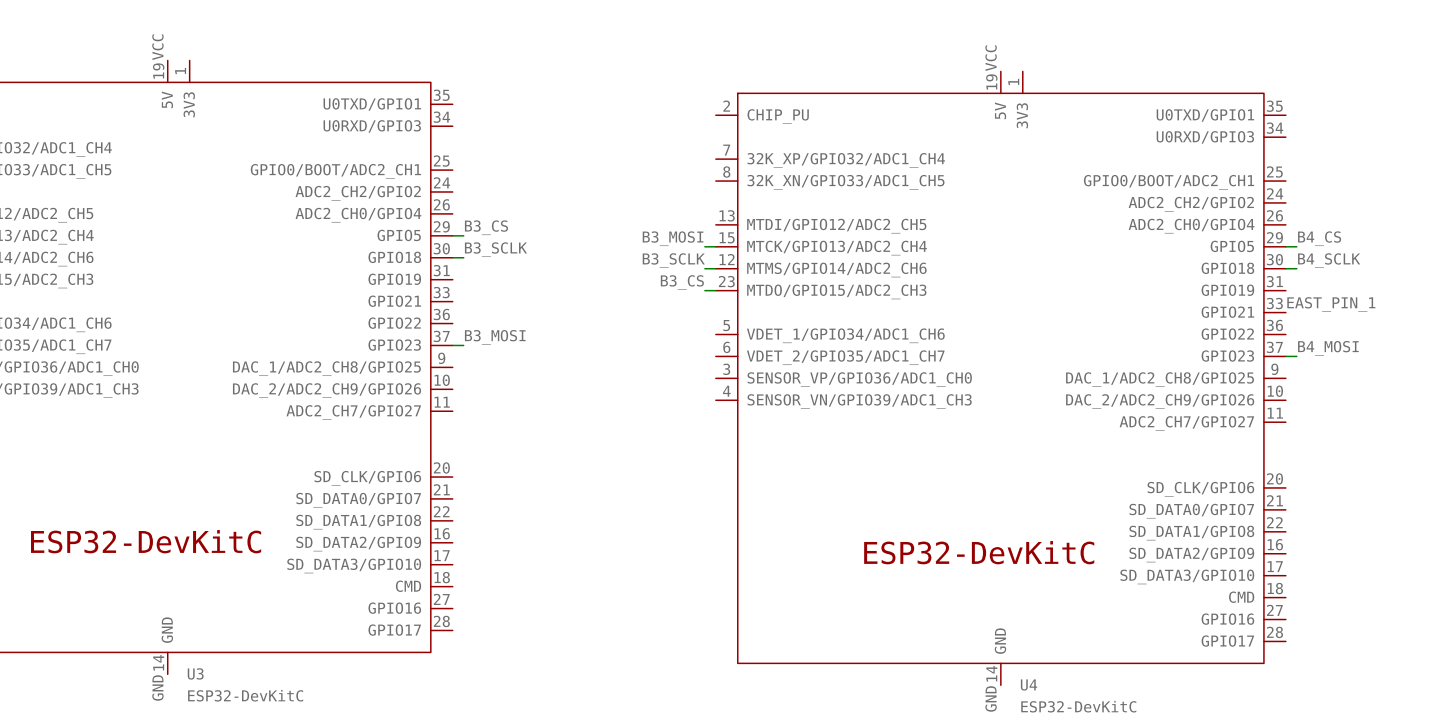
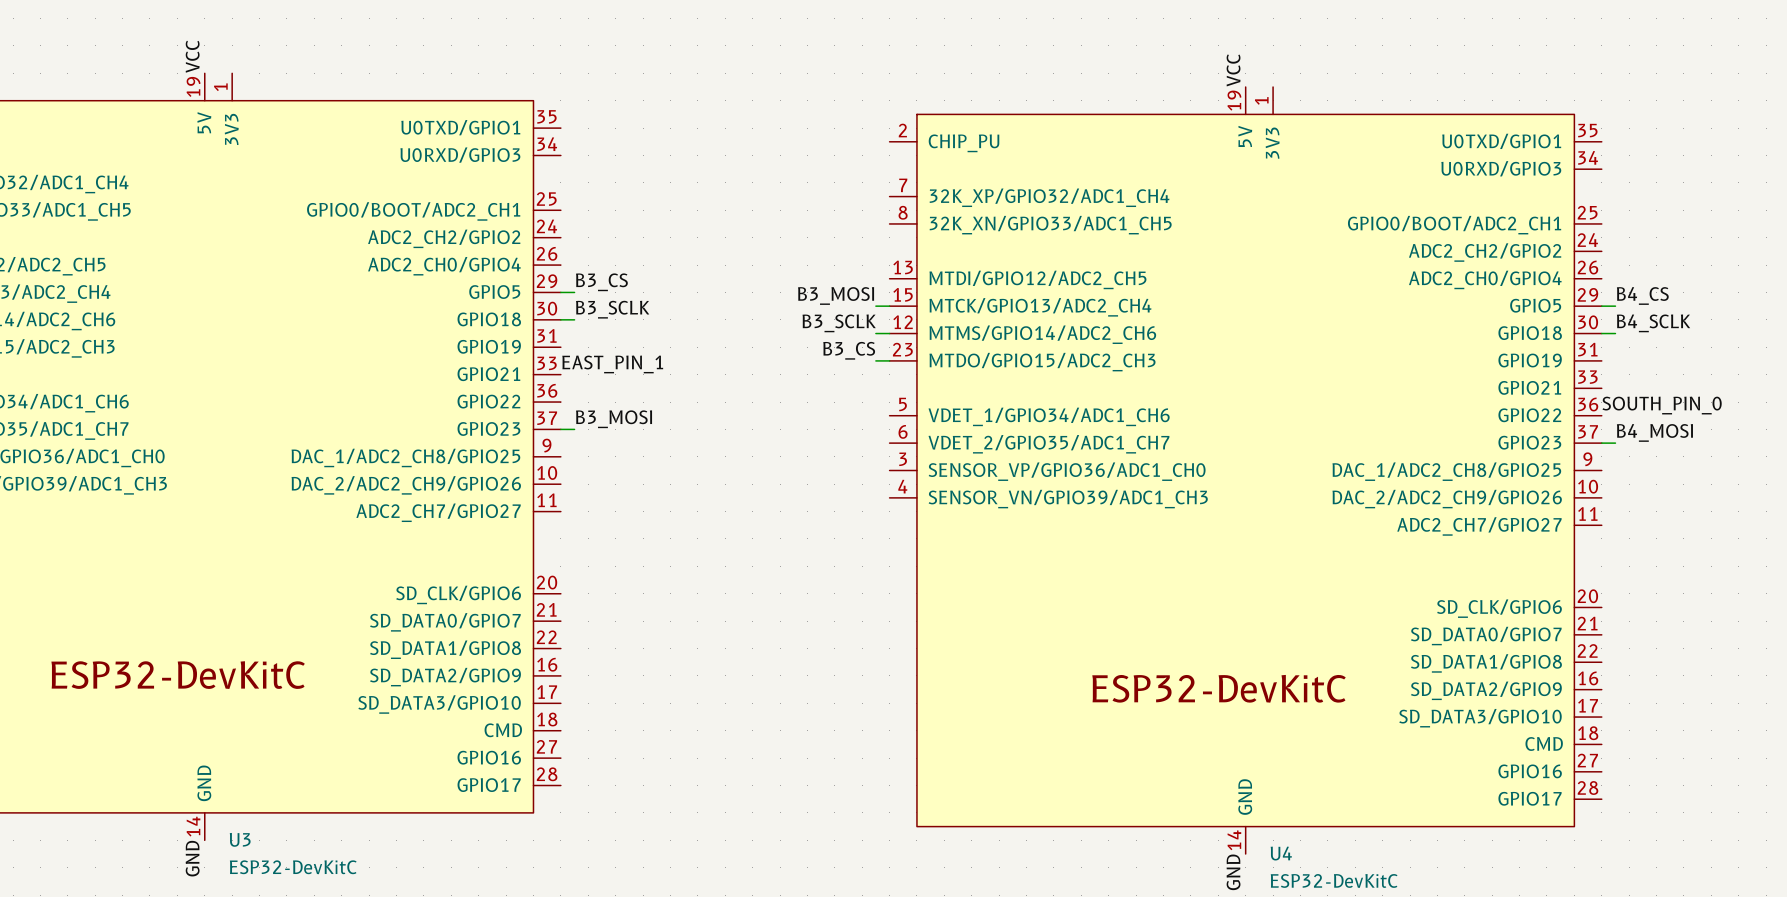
label: none -> EAST_PIN_1 (612, 364)
label: EAST_PIN_1 (1331, 304) -> SOUTH_PIN_0 (1662, 405)

